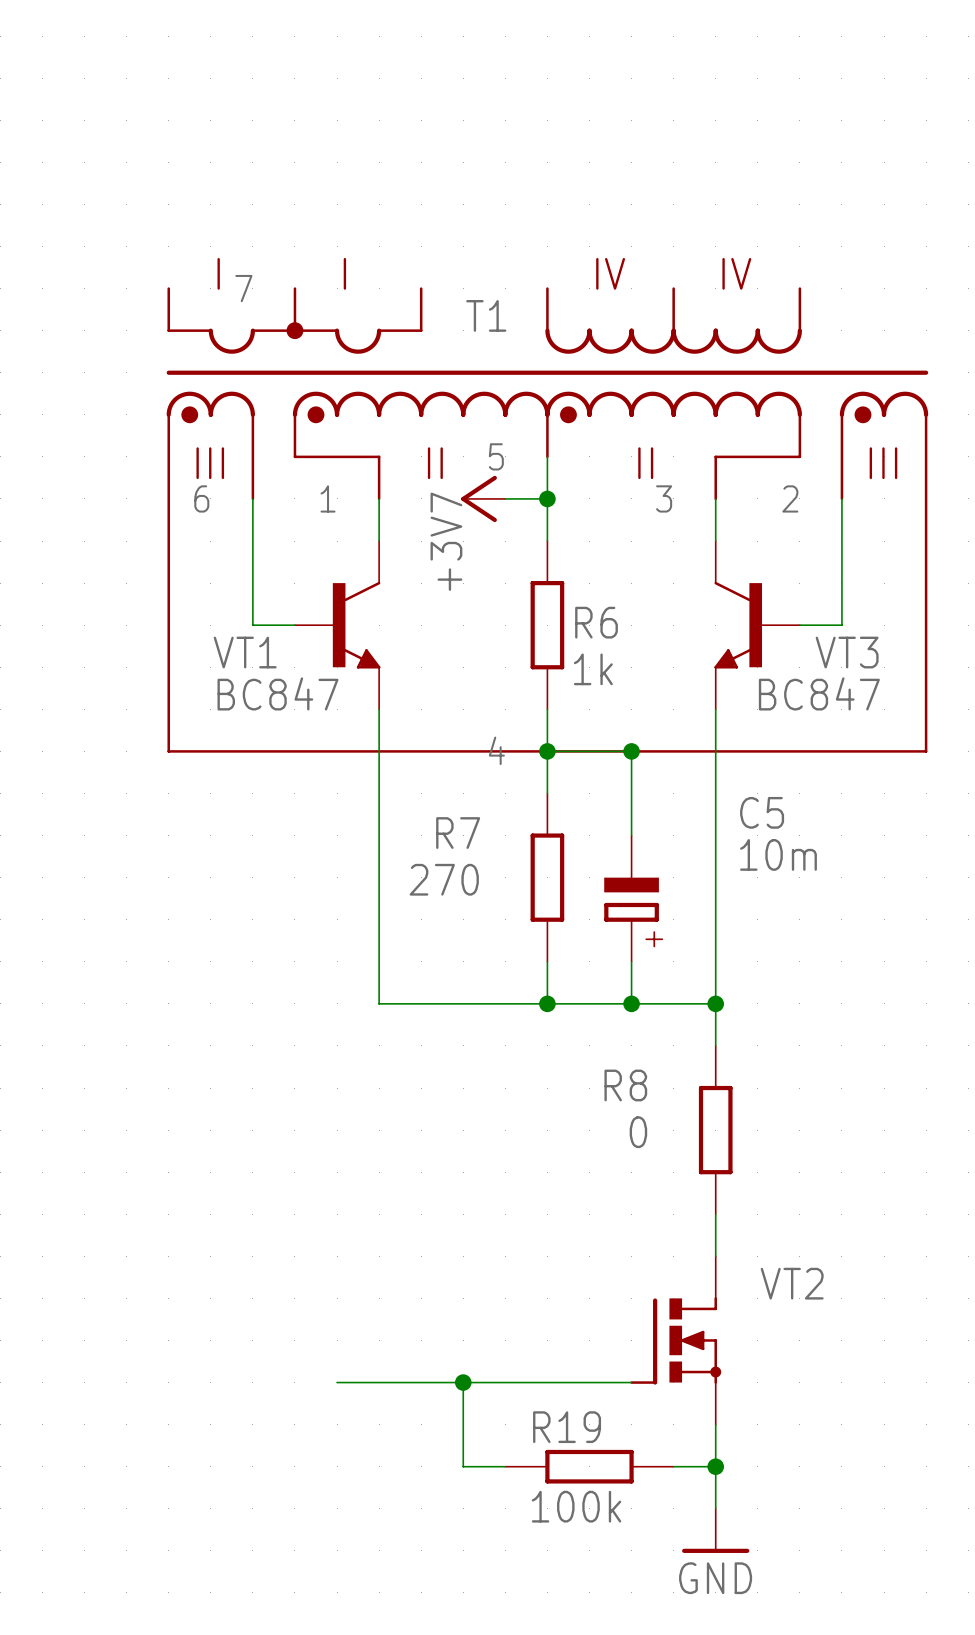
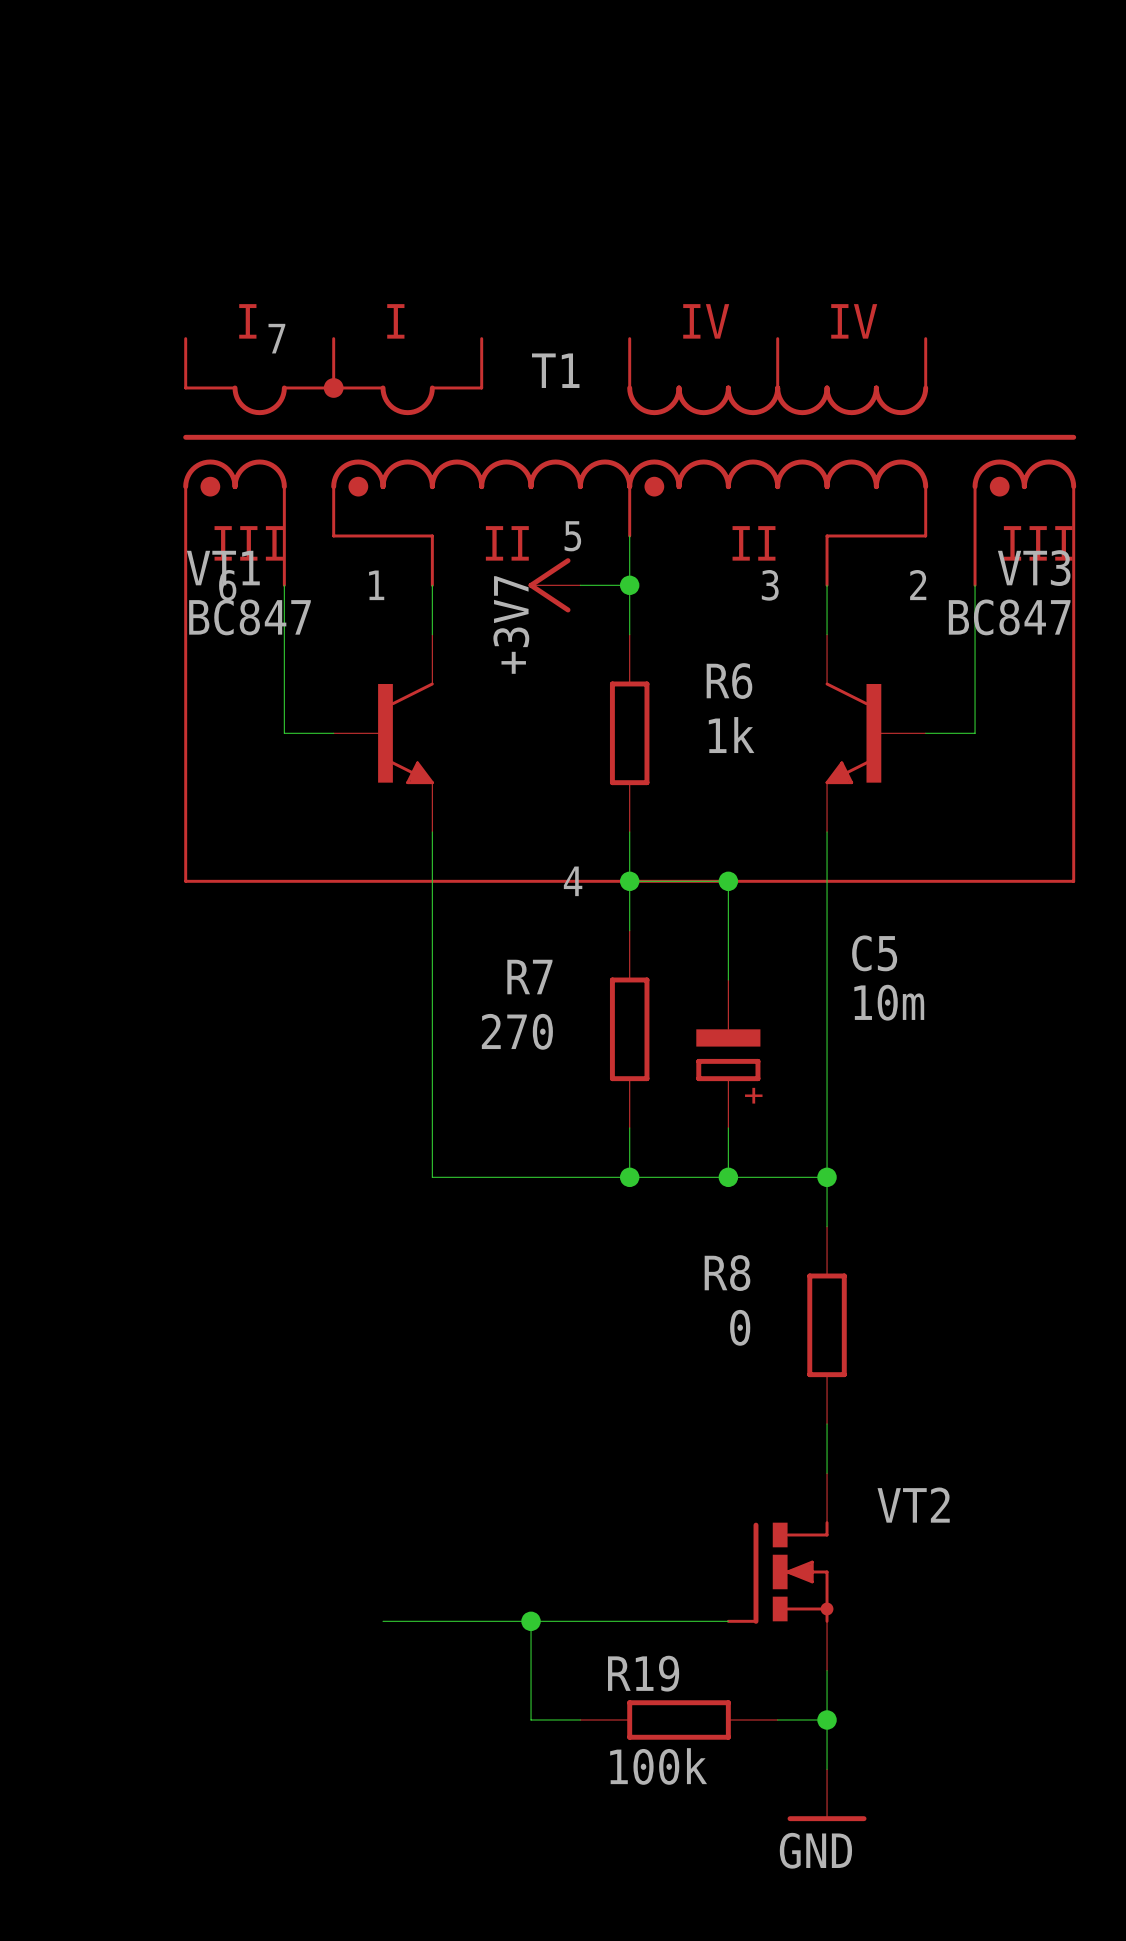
R6 name position: R6 (596, 622) -> R6 (729, 681)
VT1 name position: VT1 (245, 652) -> VT1 (223, 568)
VT3 name position: VT3 (847, 652) -> VT3 (1034, 568)
R6 value position: 1k (593, 669) -> 1k (731, 735)
VT1 value position: BC847 (277, 693) -> BC847 (249, 617)
VT3 value position: BC847 (819, 693) -> BC847 (1009, 617)

